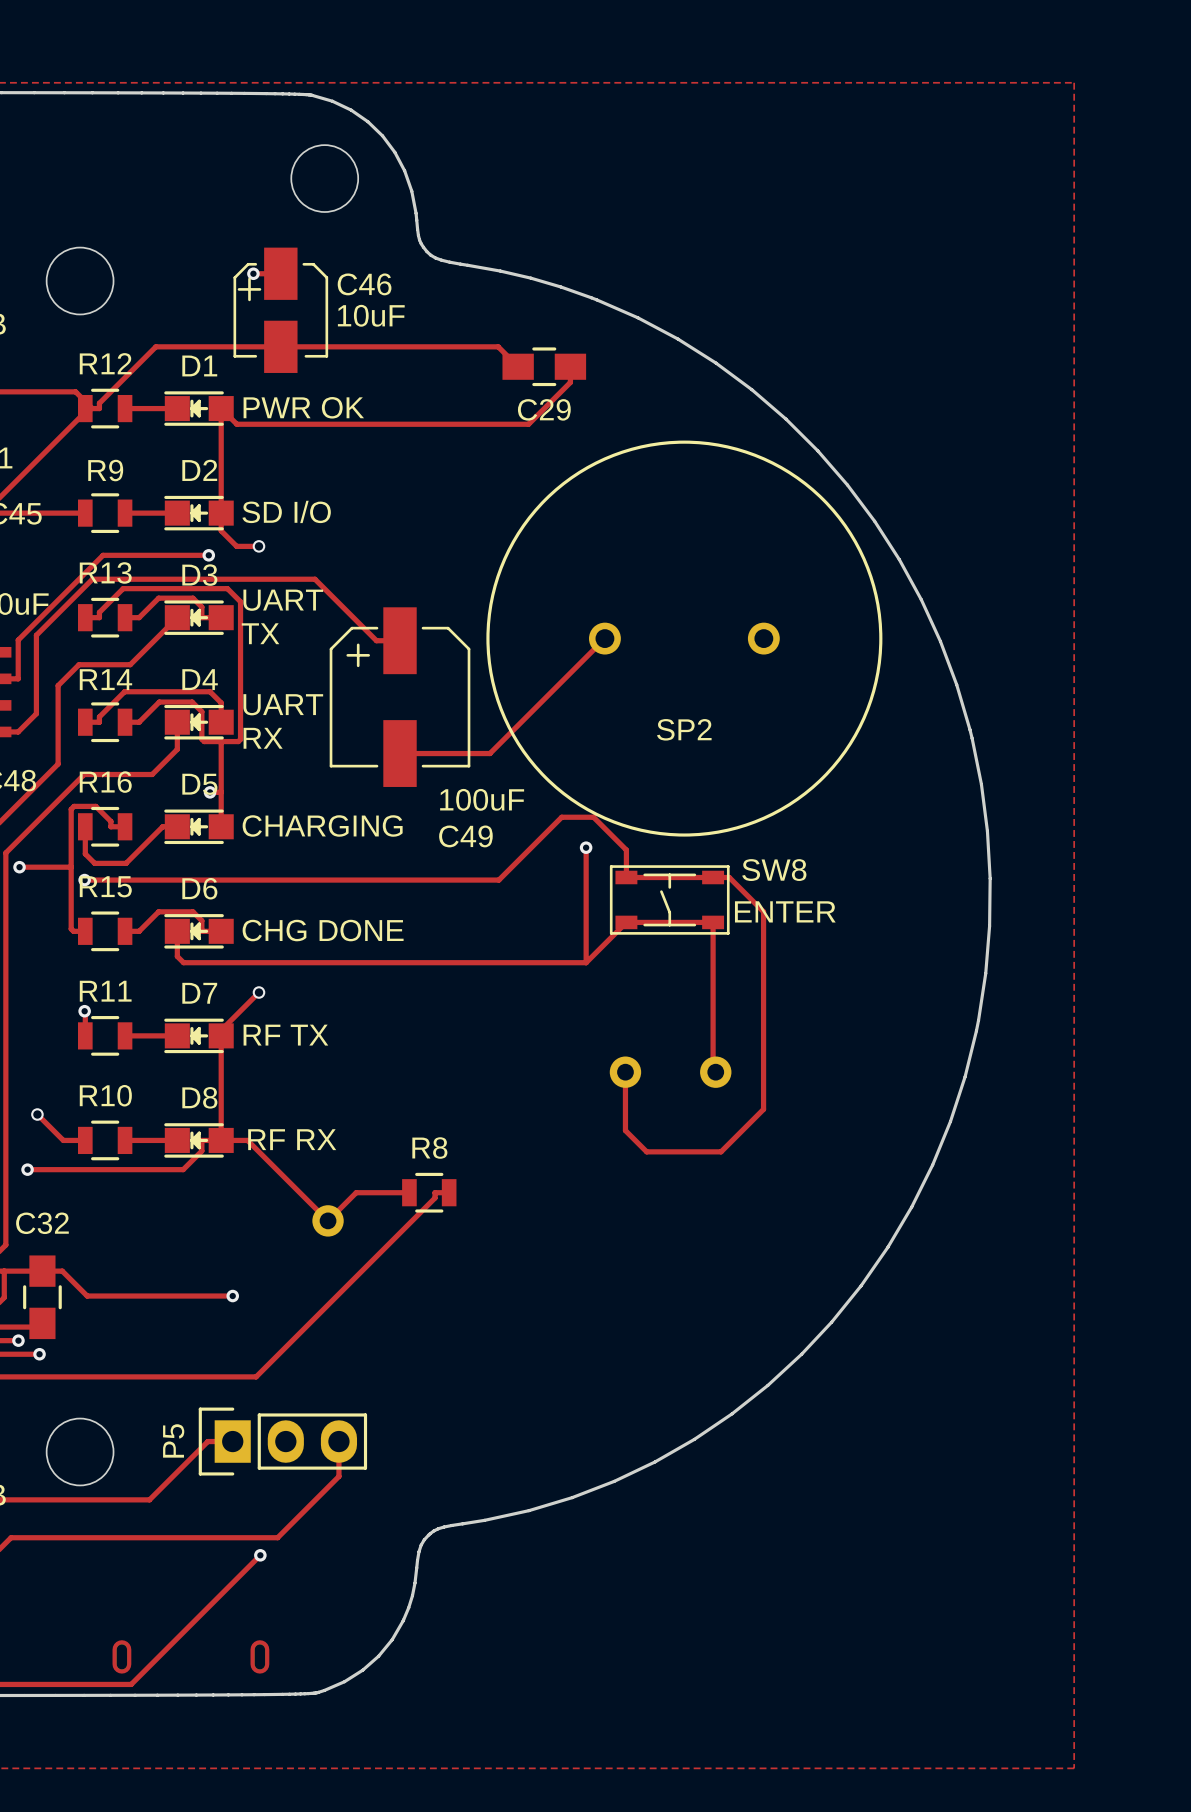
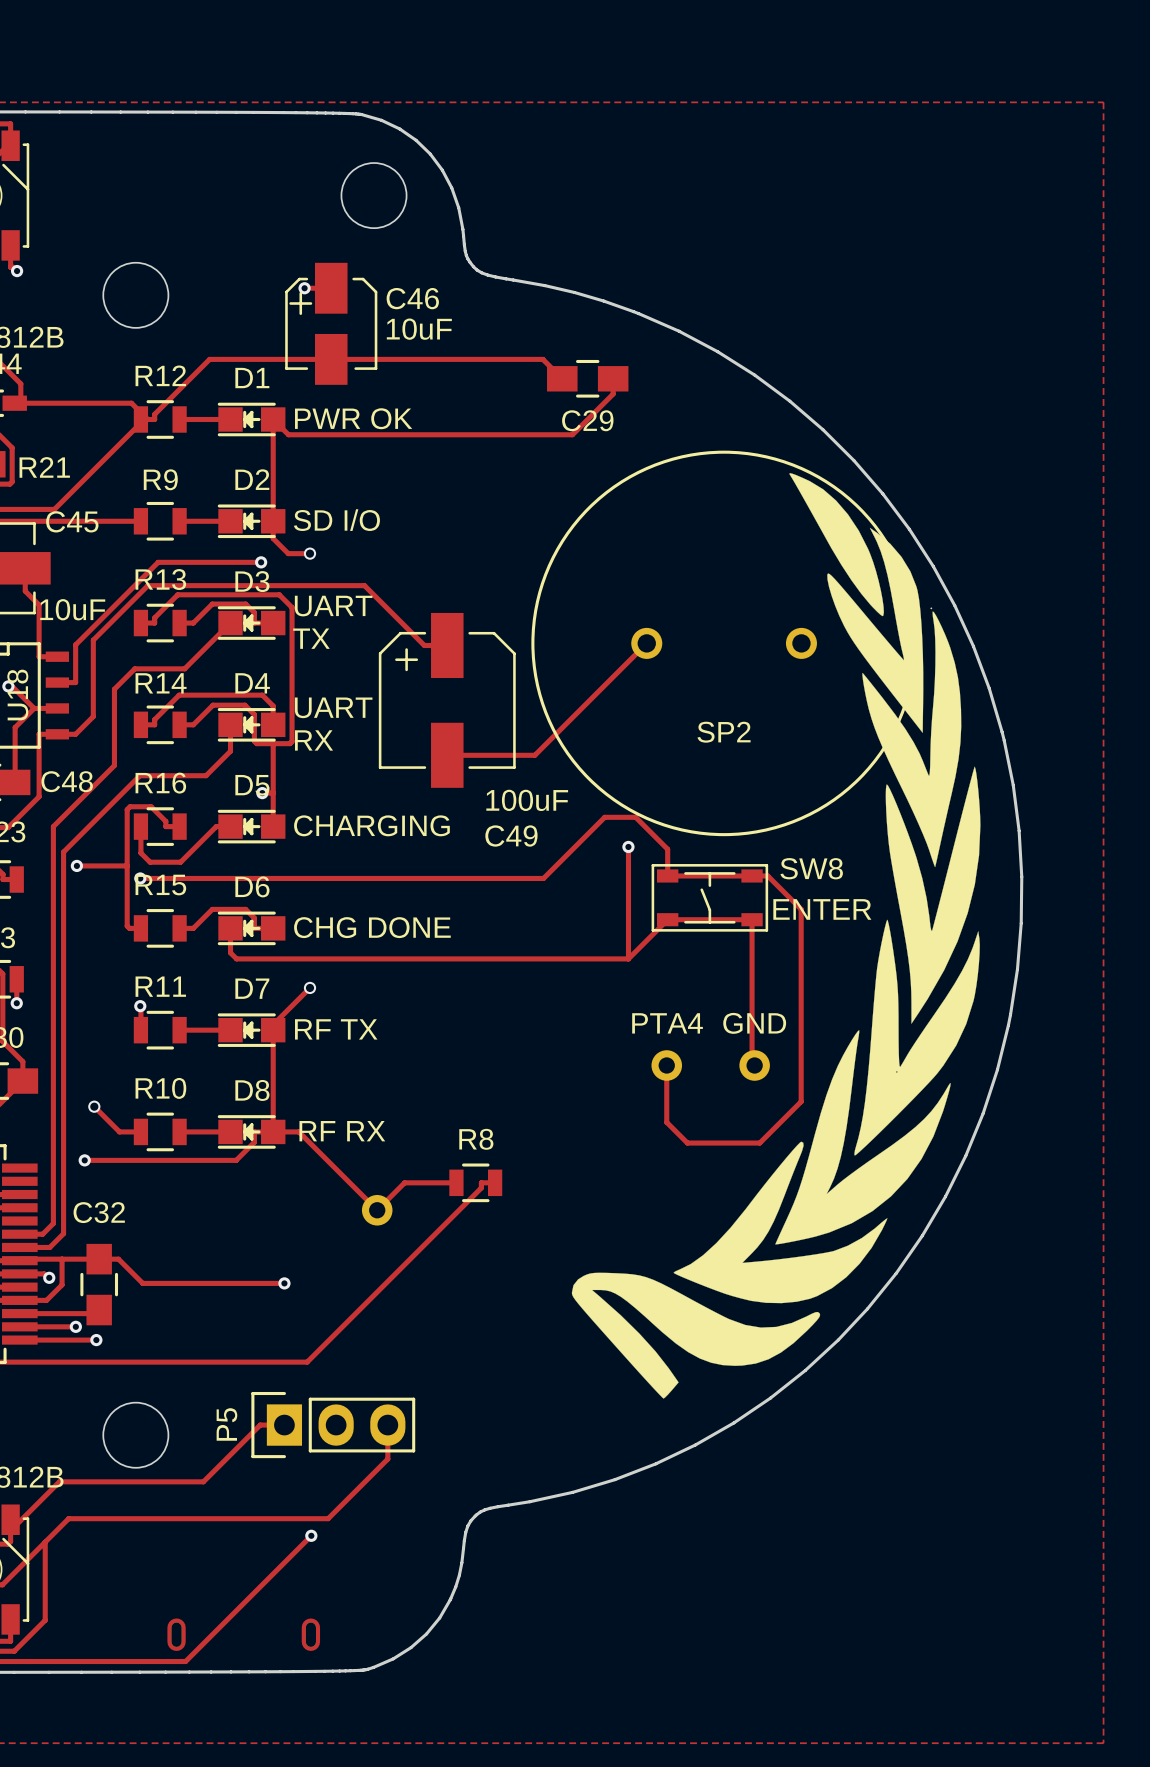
drawing: none -> [571, 473, 981, 1399]
text: none -> PTA4 (667, 1023)
text: none -> GND (754, 1023)

